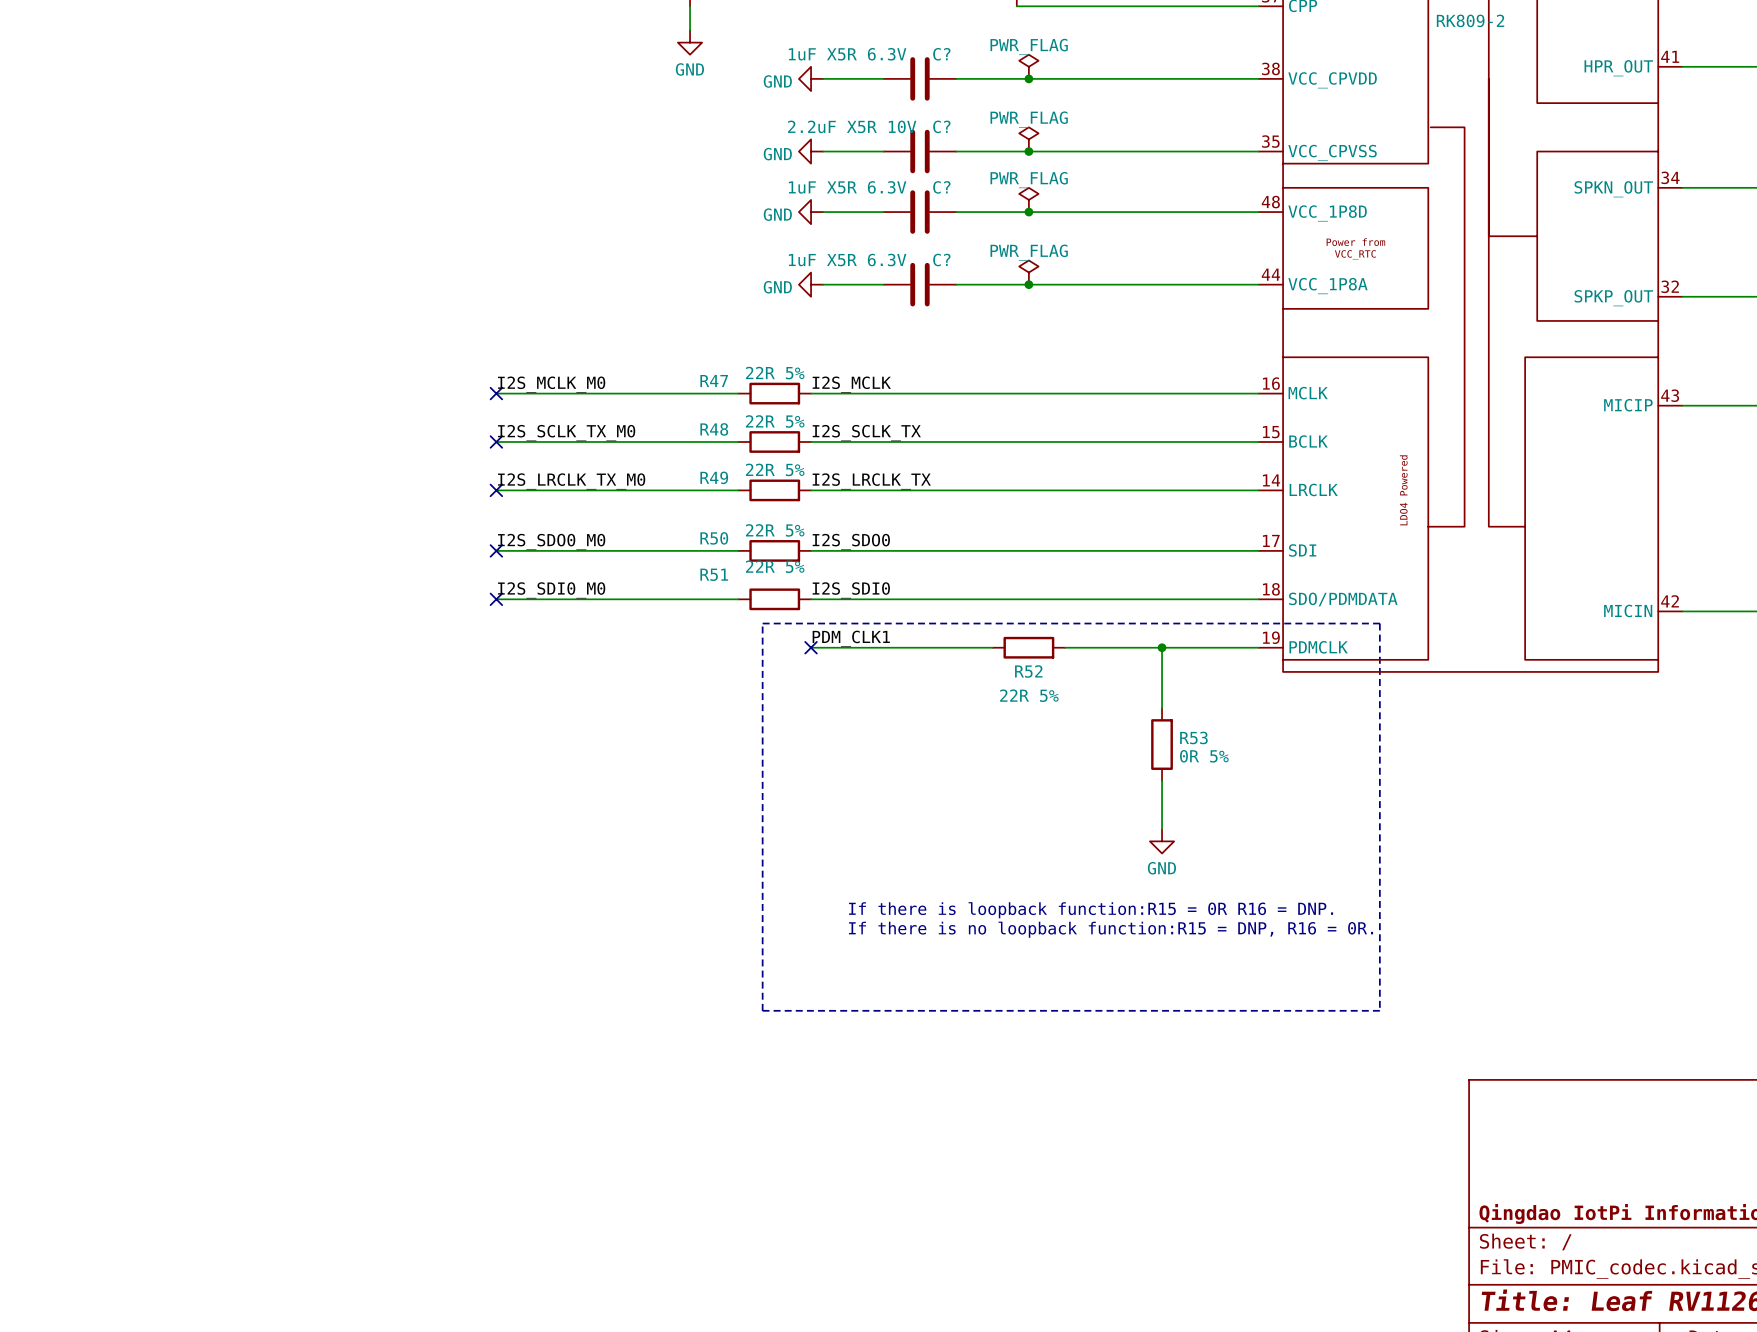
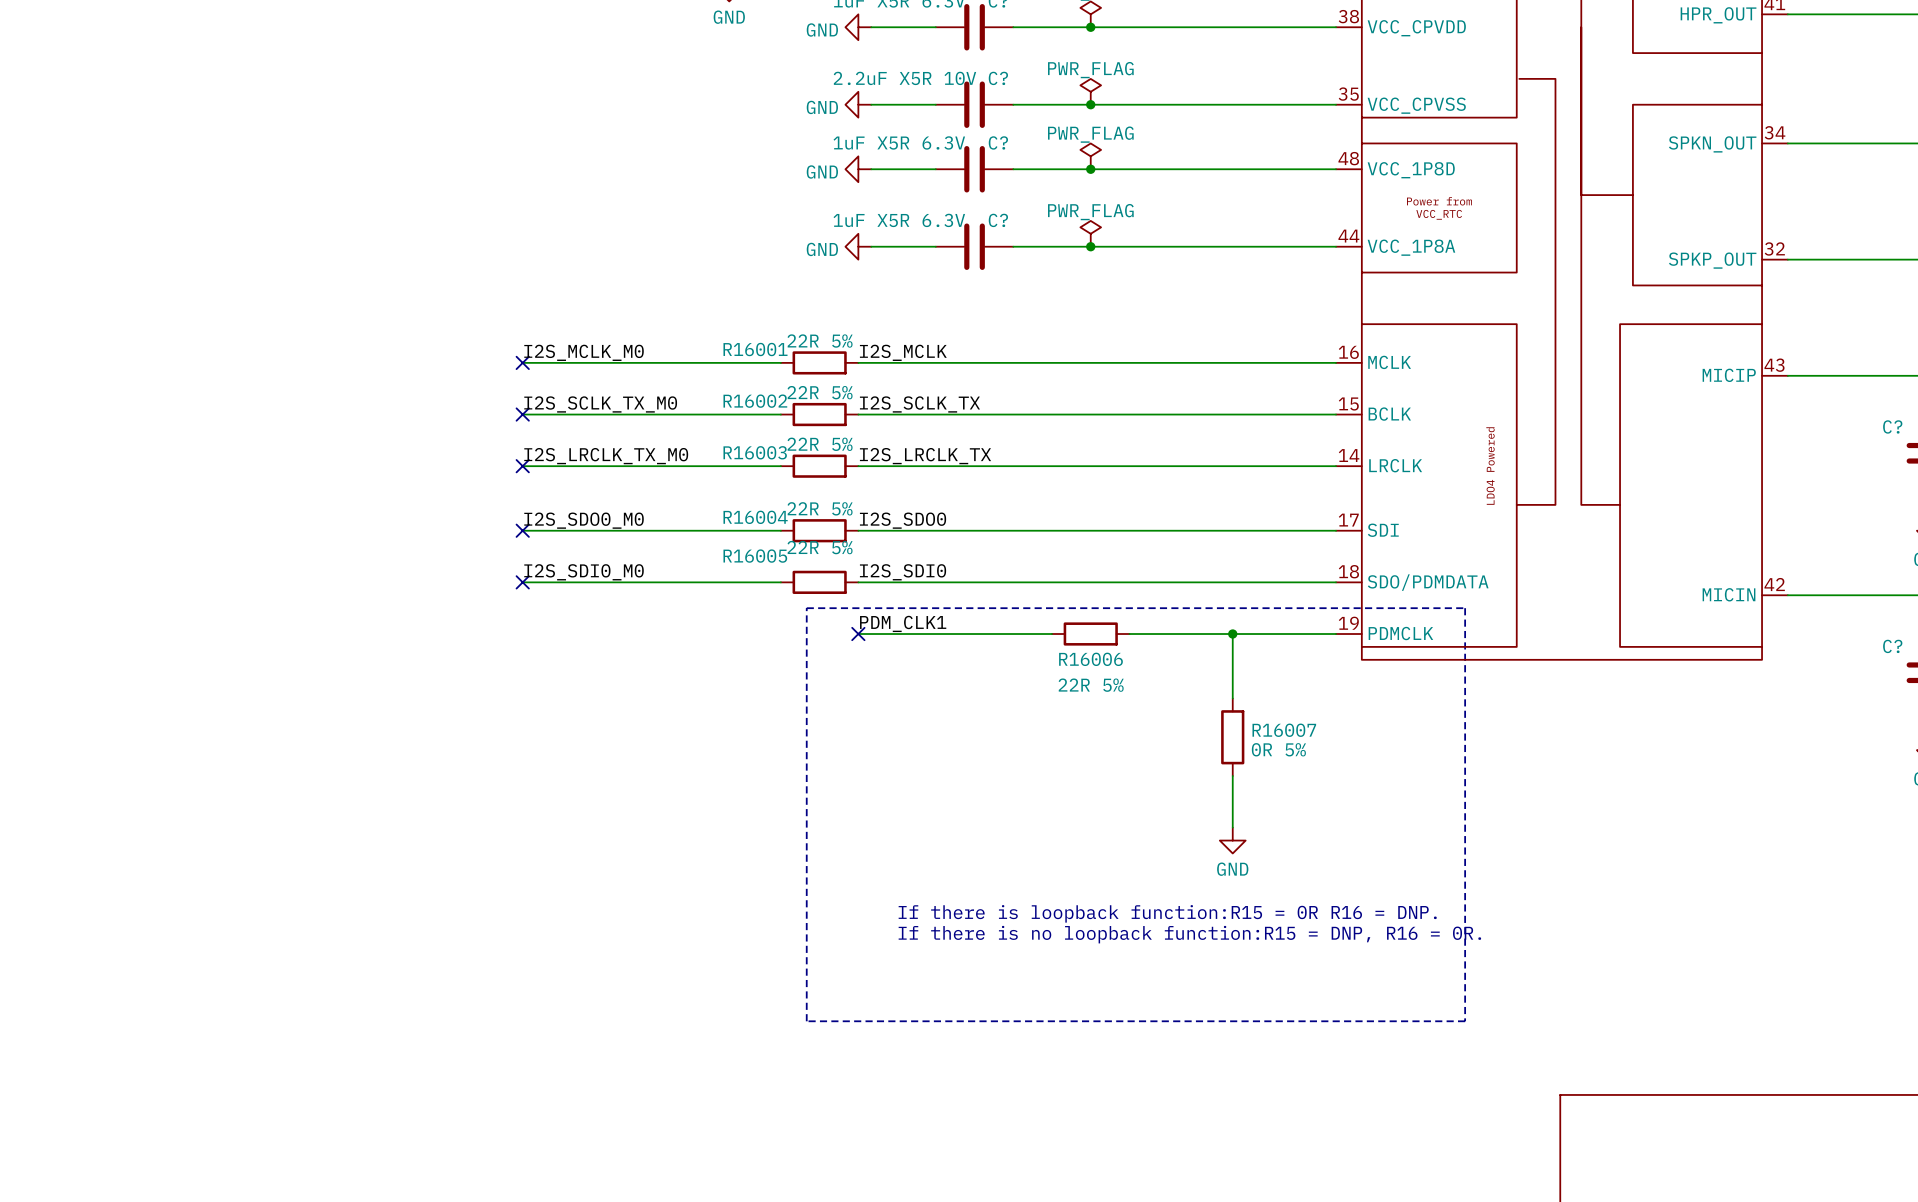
R47 name: R47 (714, 381) -> R16001 (755, 349)
R48 name: R48 (714, 429) -> R16002 (755, 401)
R49 name: R49 (714, 477) -> R16003 (755, 452)
R50 name: R50 (714, 538) -> R16004 (755, 517)
R51 name: R51 (714, 574) -> R16005 (755, 556)
R52 name: R52 (1028, 671) -> R16006 (1090, 659)
R53 name: R53 (1193, 737) -> R16007 (1284, 730)

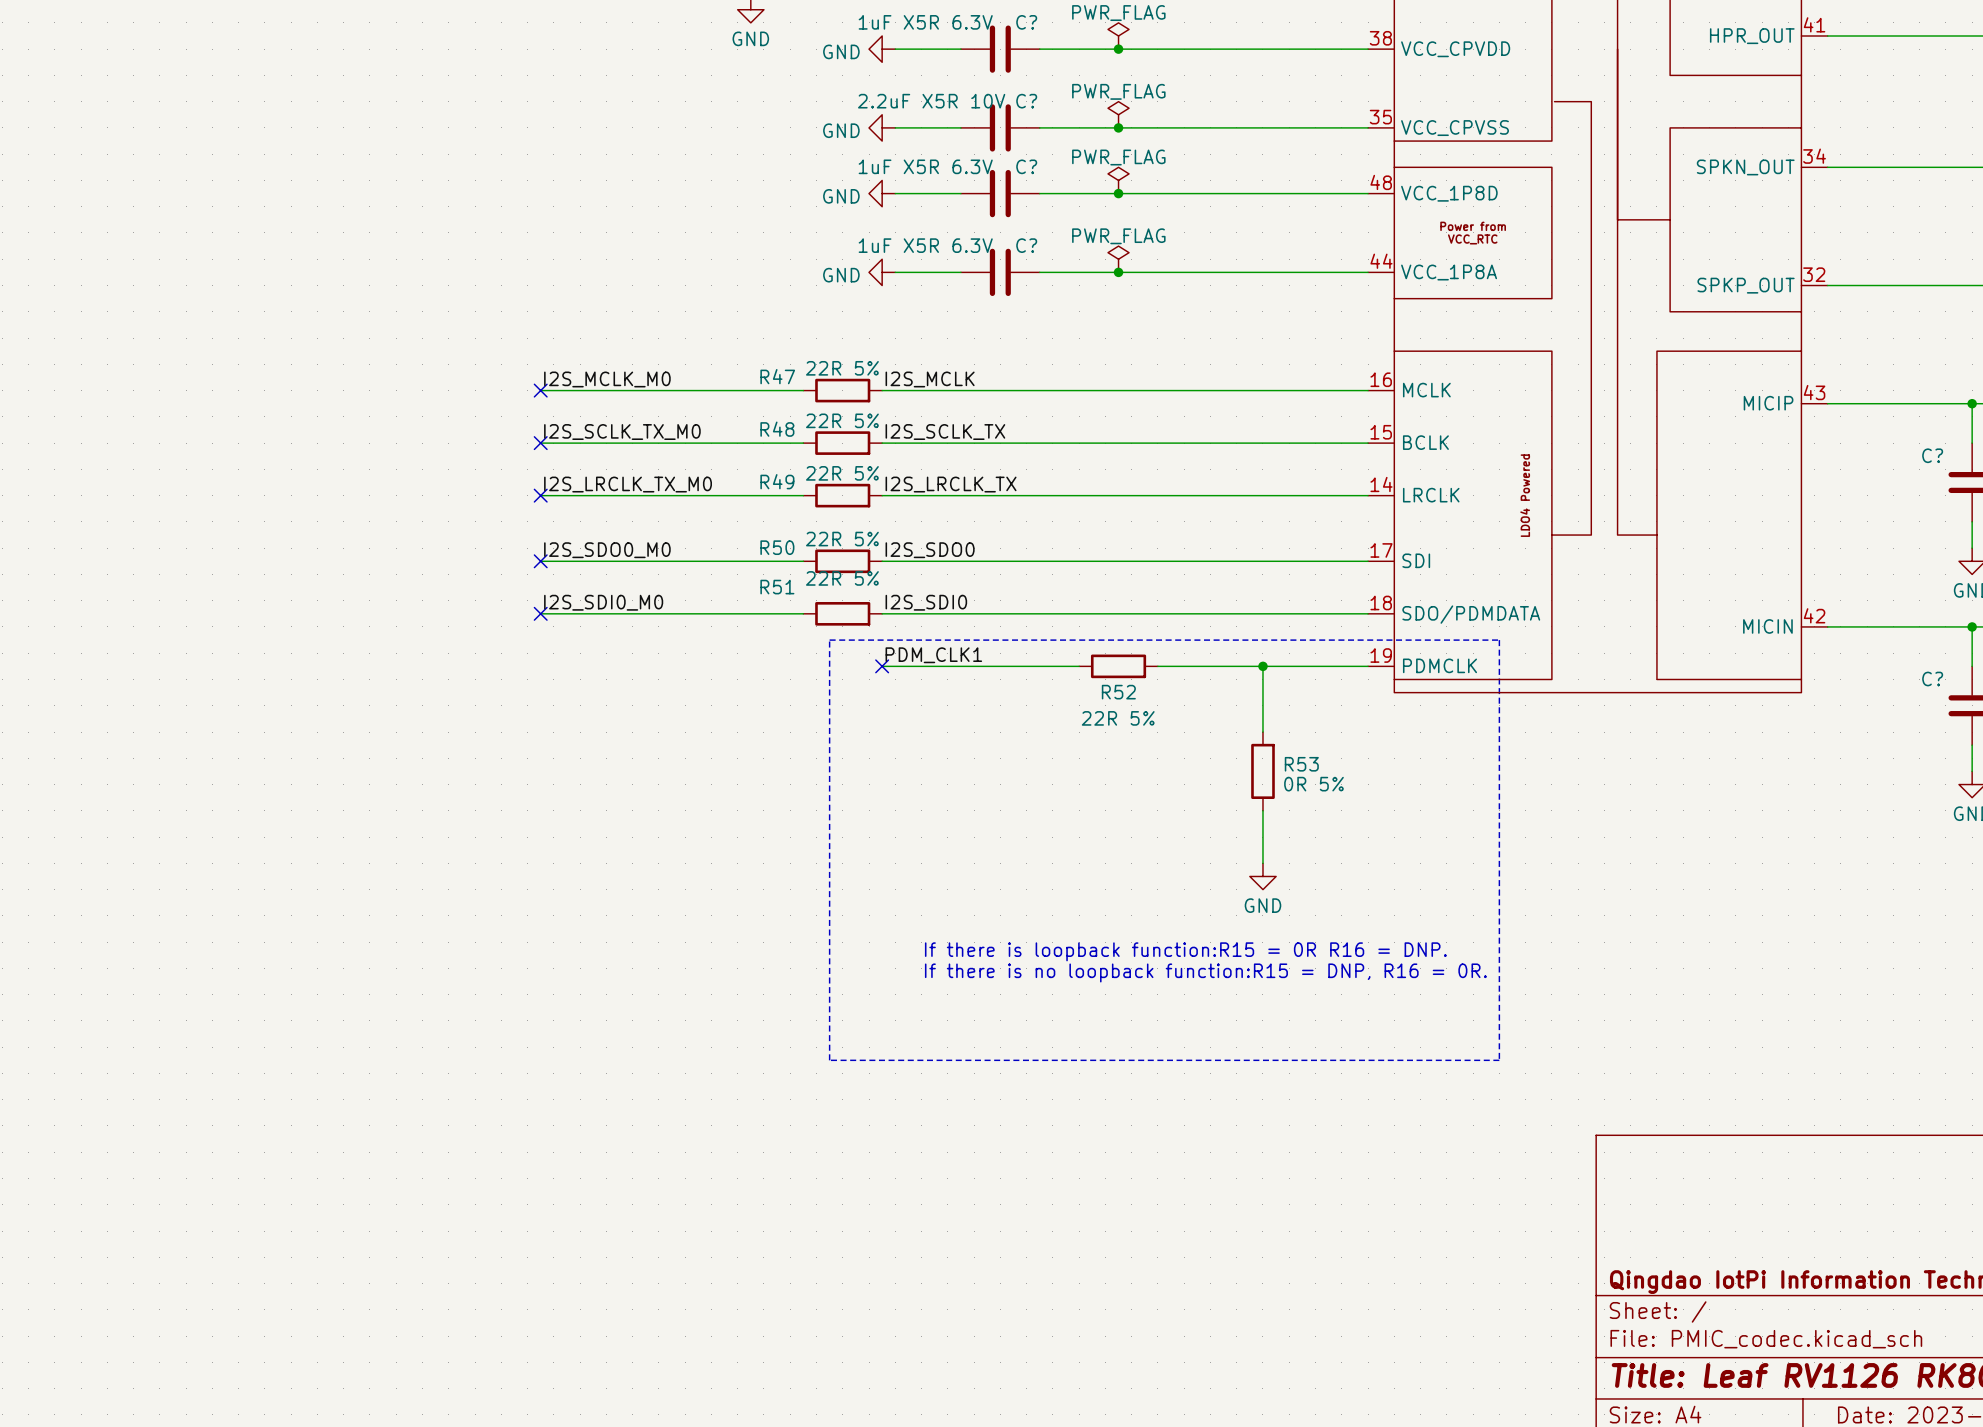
R16001 name: R16001 (755, 349) -> R47 (777, 376)
R16002 name: R16002 (755, 401) -> R48 (777, 429)
R16003 name: R16003 (755, 452) -> R49 (777, 481)
R16004 name: R16004 (755, 517) -> R50 (777, 547)
R16005 name: R16005 (755, 556) -> R51 (777, 587)
R16006 name: R16006 (1090, 659) -> R52 (1118, 692)
R16007 name: R16007 (1284, 730) -> R53 (1301, 764)

